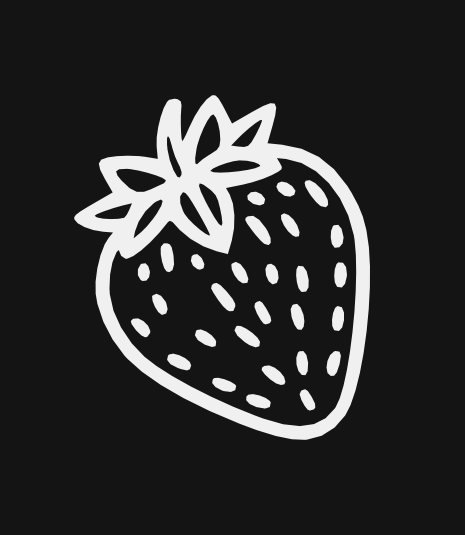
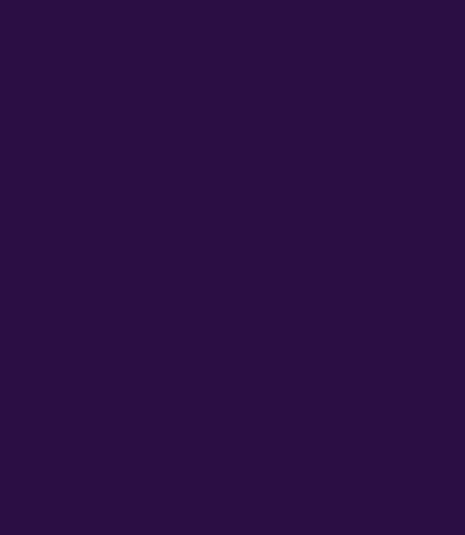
drawing: [74, 95, 370, 440] -> none

